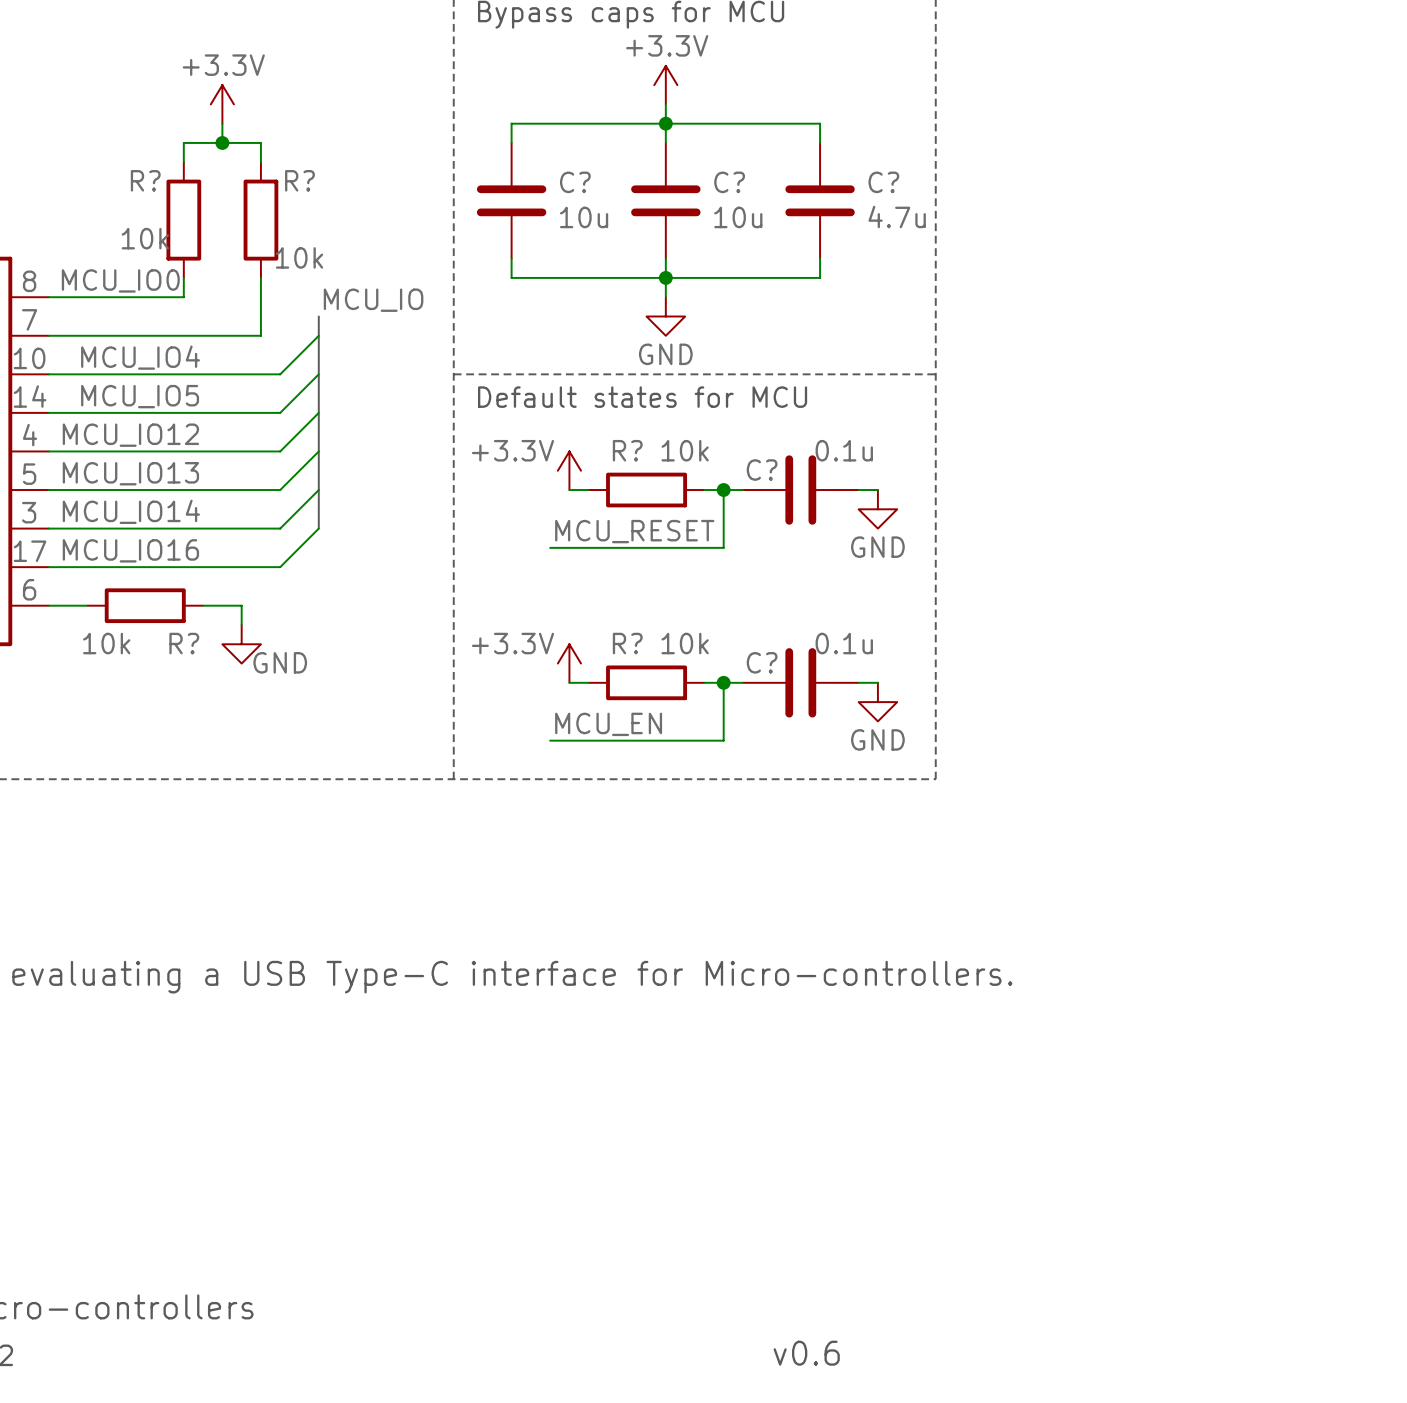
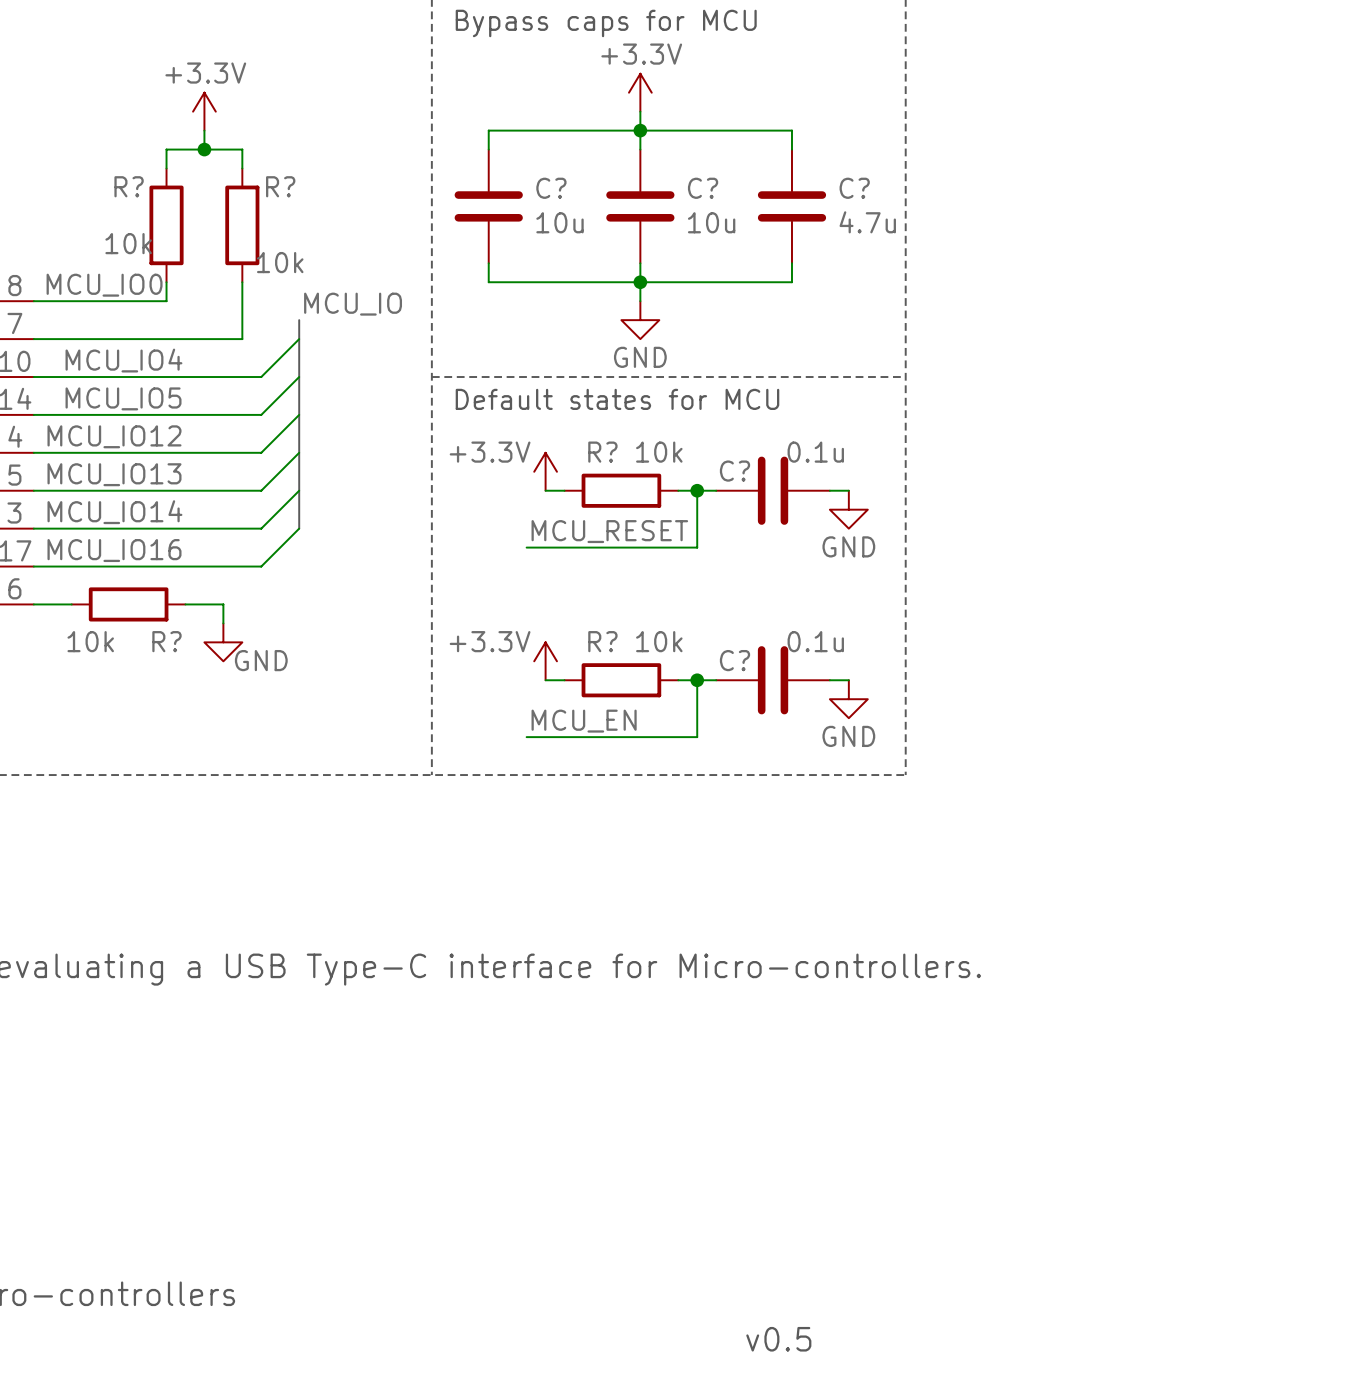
text: v0.6 (806, 1353) -> v0.5 (778, 1339)

